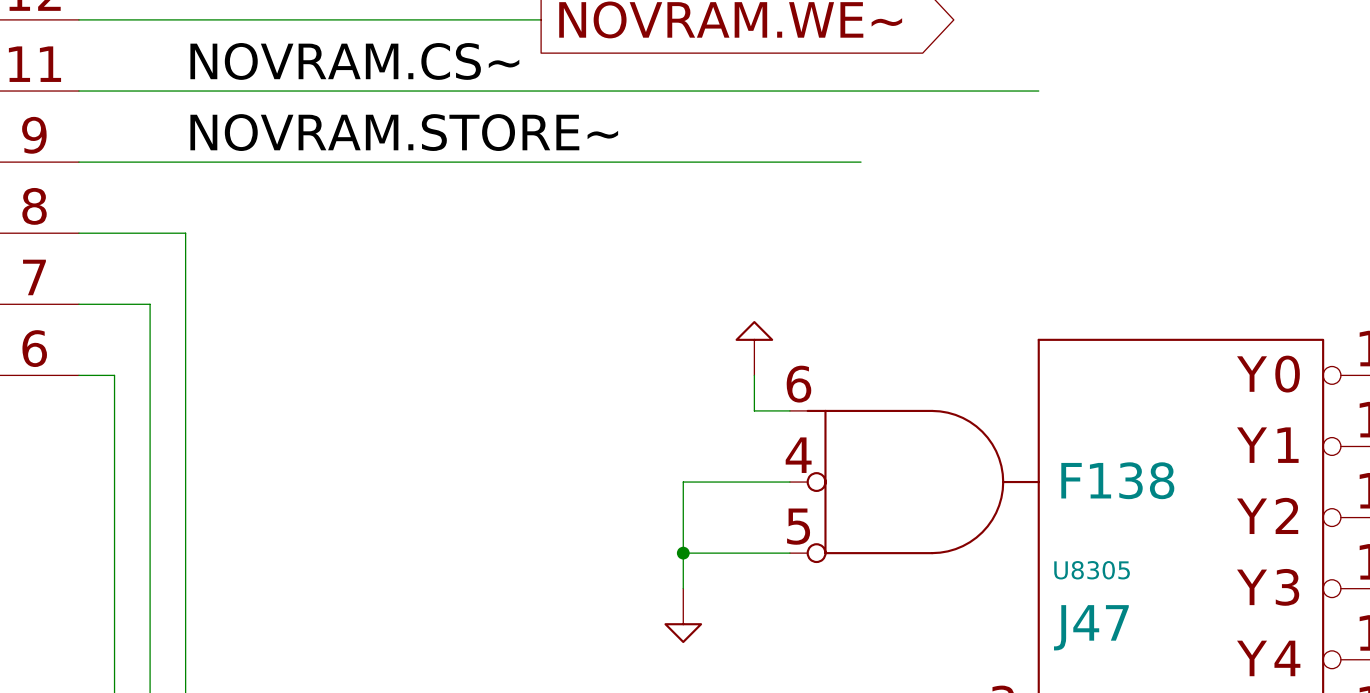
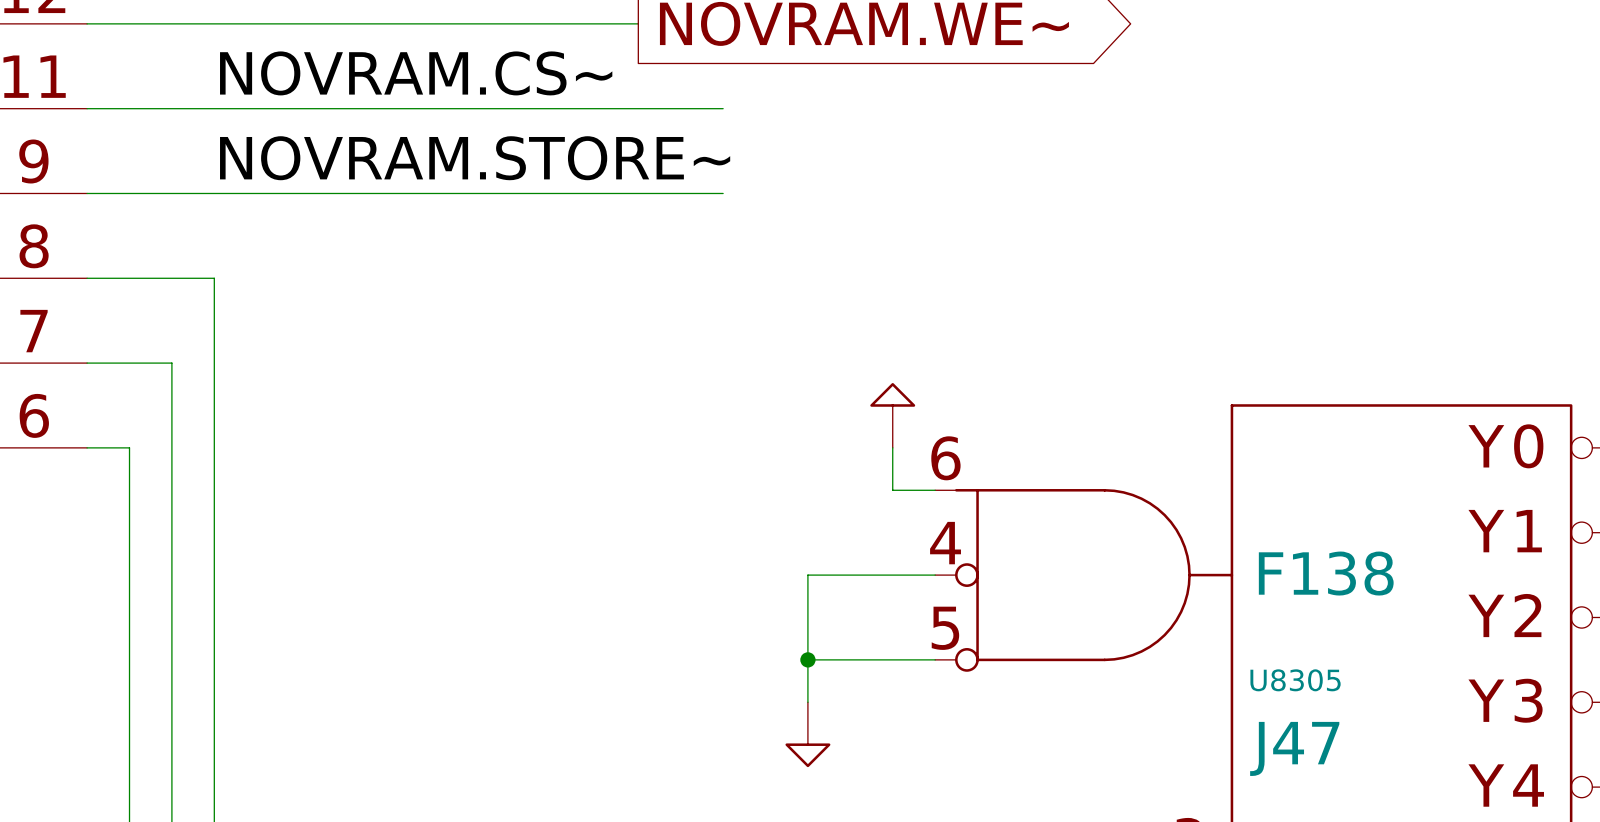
wire: (612, 91) (1038, 91) -> none
wire: (612, 162) (861, 162) -> none

